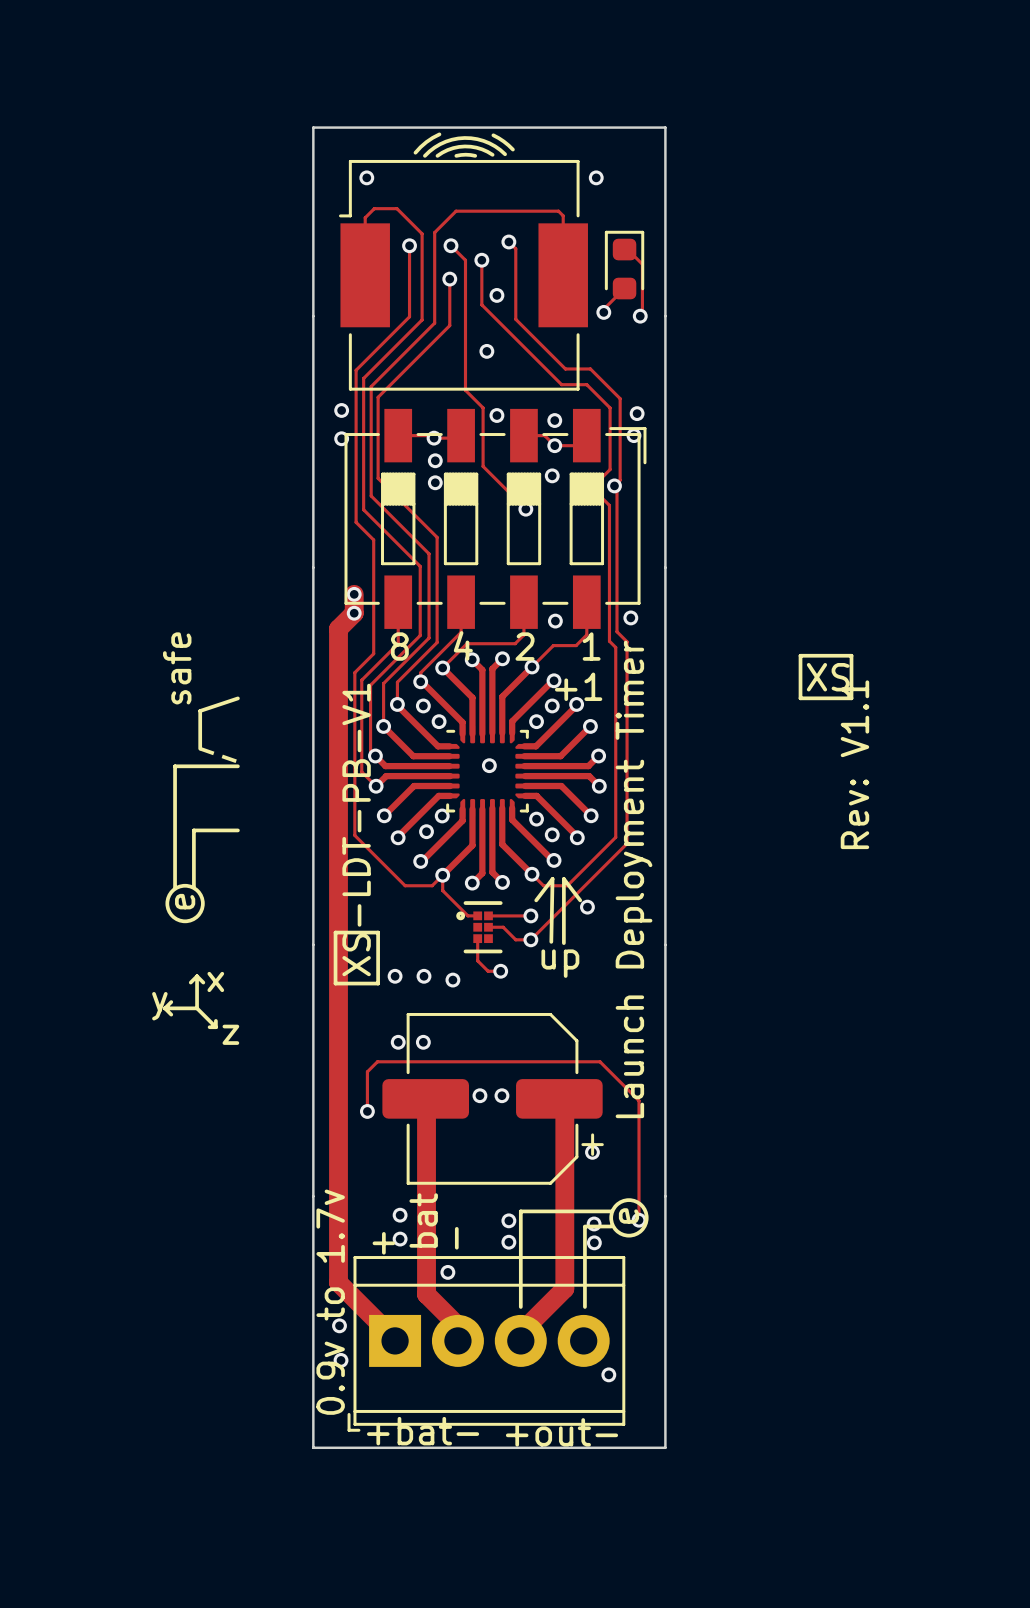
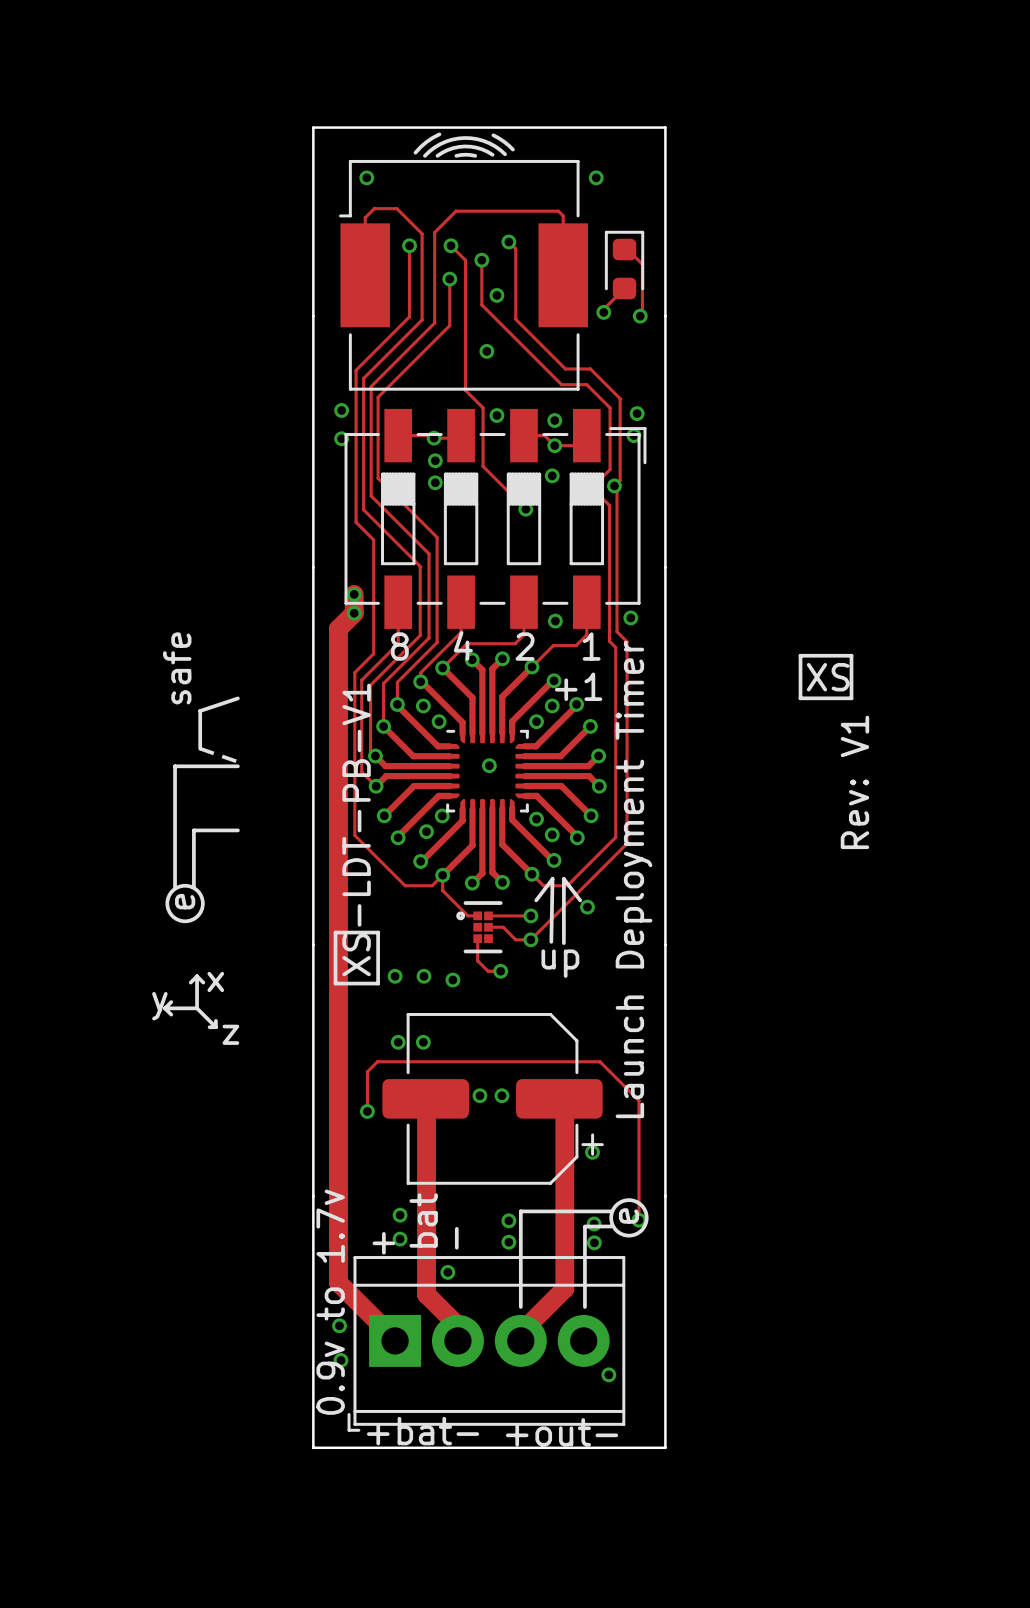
text: Rev: V1.1 (854, 764) -> Rev: V1 (854, 782)

